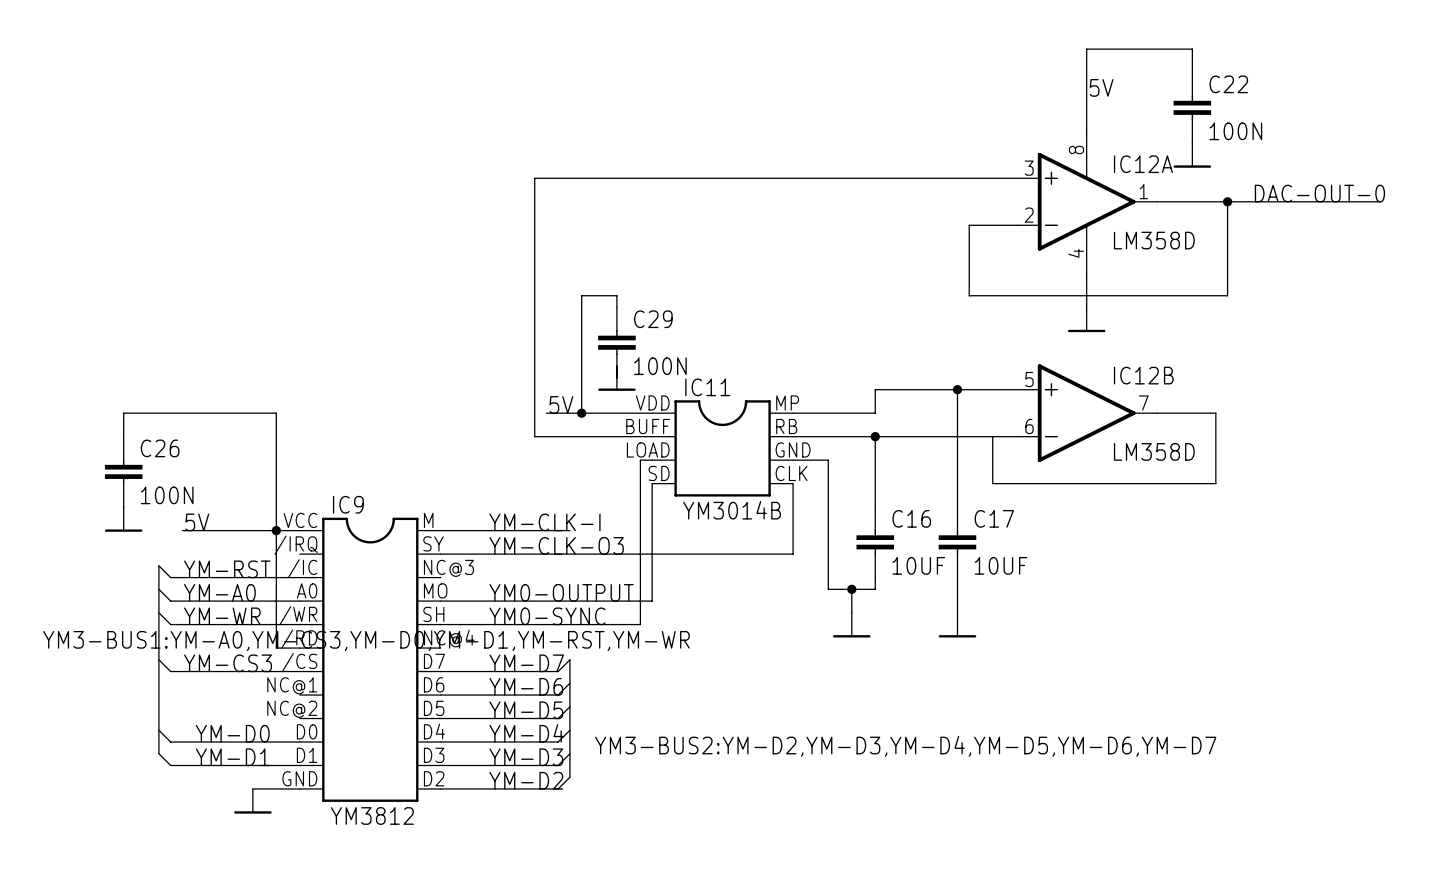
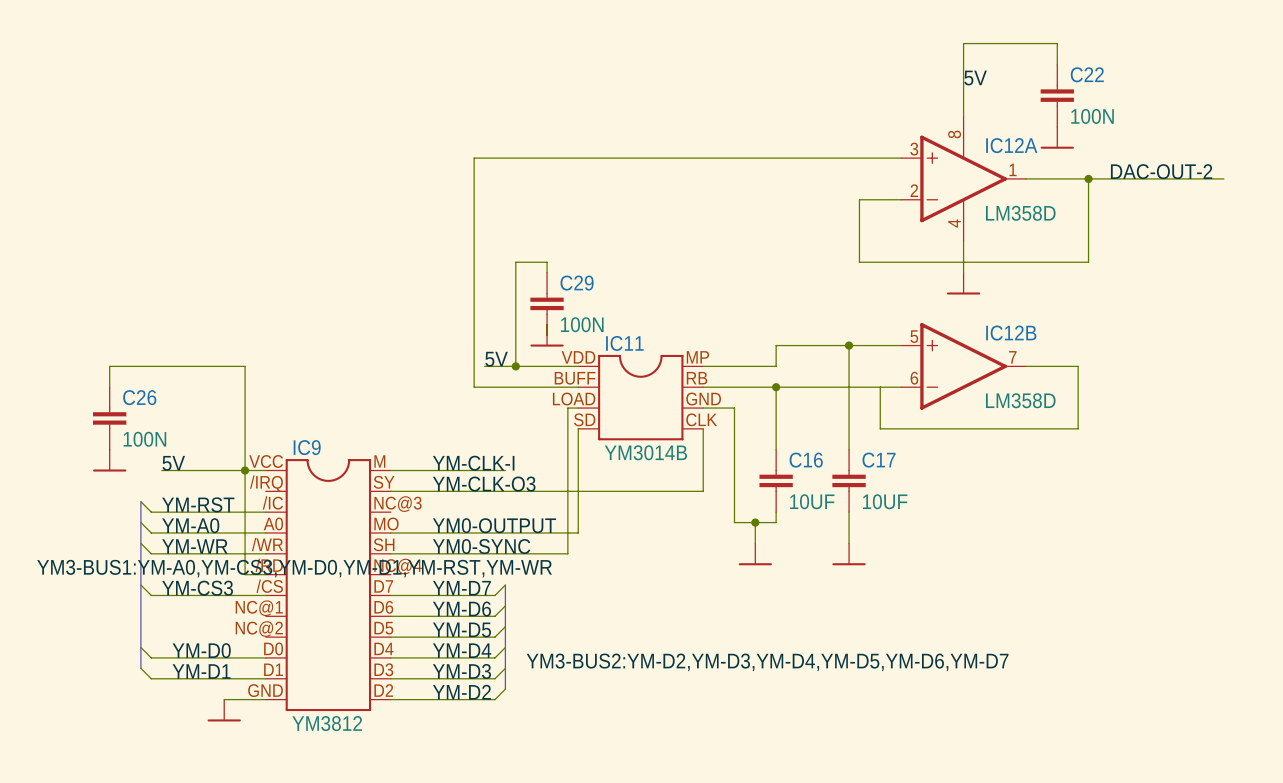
label: DAC-OUT-0 (1319, 193) -> DAC-OUT-2 (1161, 171)

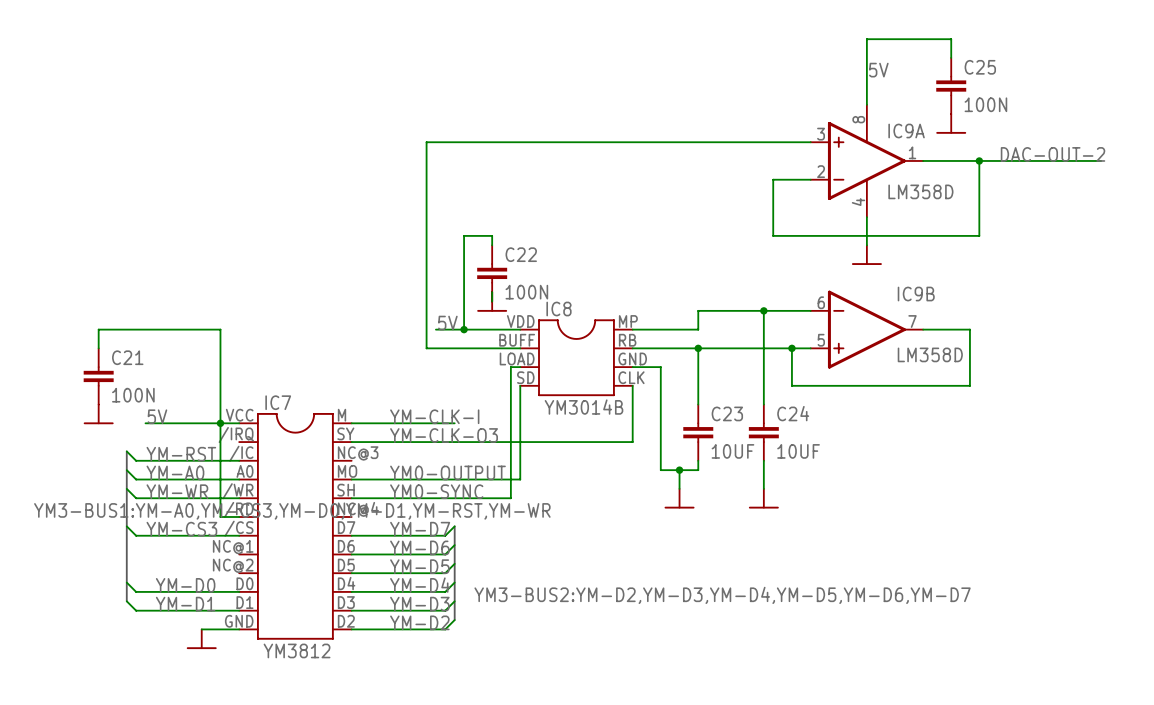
C22 name: C22 (1087, 74) -> C25 (980, 67)
IC12A name: IC12A (1011, 145) -> IC9A (906, 131)
C29 name: C29 (577, 283) -> C22 (521, 254)
IC11 name: IC11 (624, 343) -> IC8 (558, 309)
IC12B: LM358D (963, 366) -> none
IC9B: none -> LM358D (866, 329)
junction: none -> (791, 348)
C26 name: C26 (139, 397) -> C21 (127, 357)
IC9 name: IC9 (307, 447) -> IC7 (278, 402)
C16 name: C16 (806, 460) -> C23 (727, 413)
C17 name: C17 (879, 460) -> C24 (793, 413)

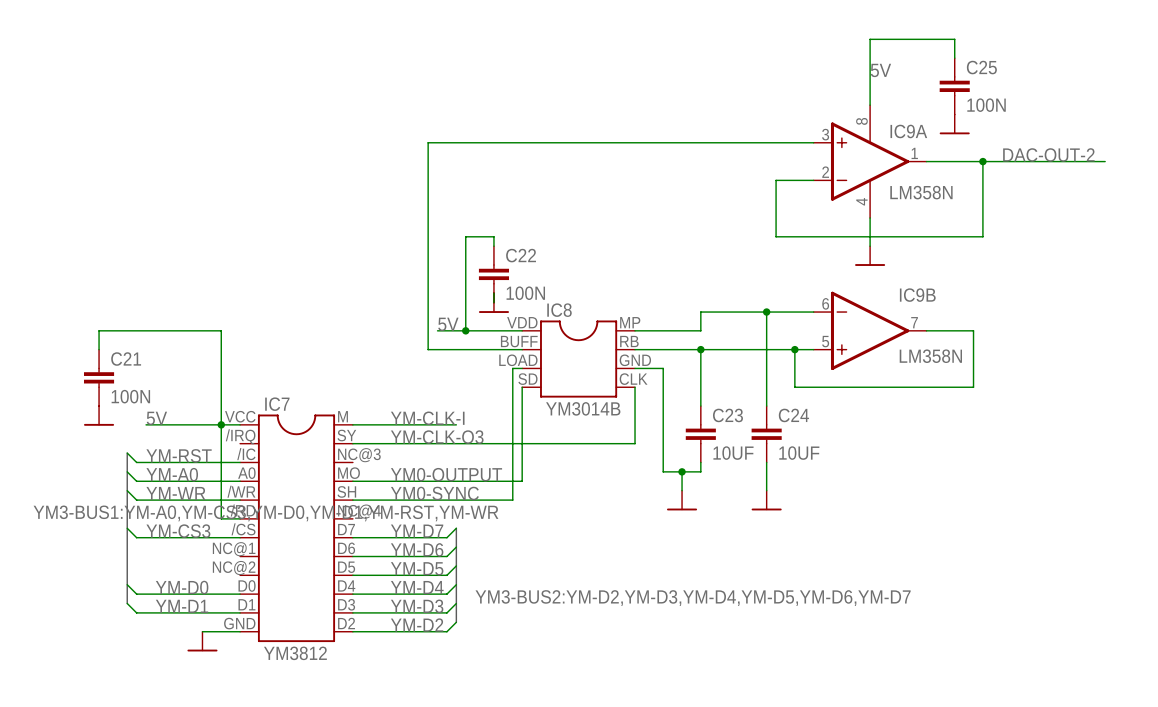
IC9A value: LM358D (920, 191) -> LM358N (921, 192)
IC9B value: LM358D (930, 354) -> LM358N (930, 356)

